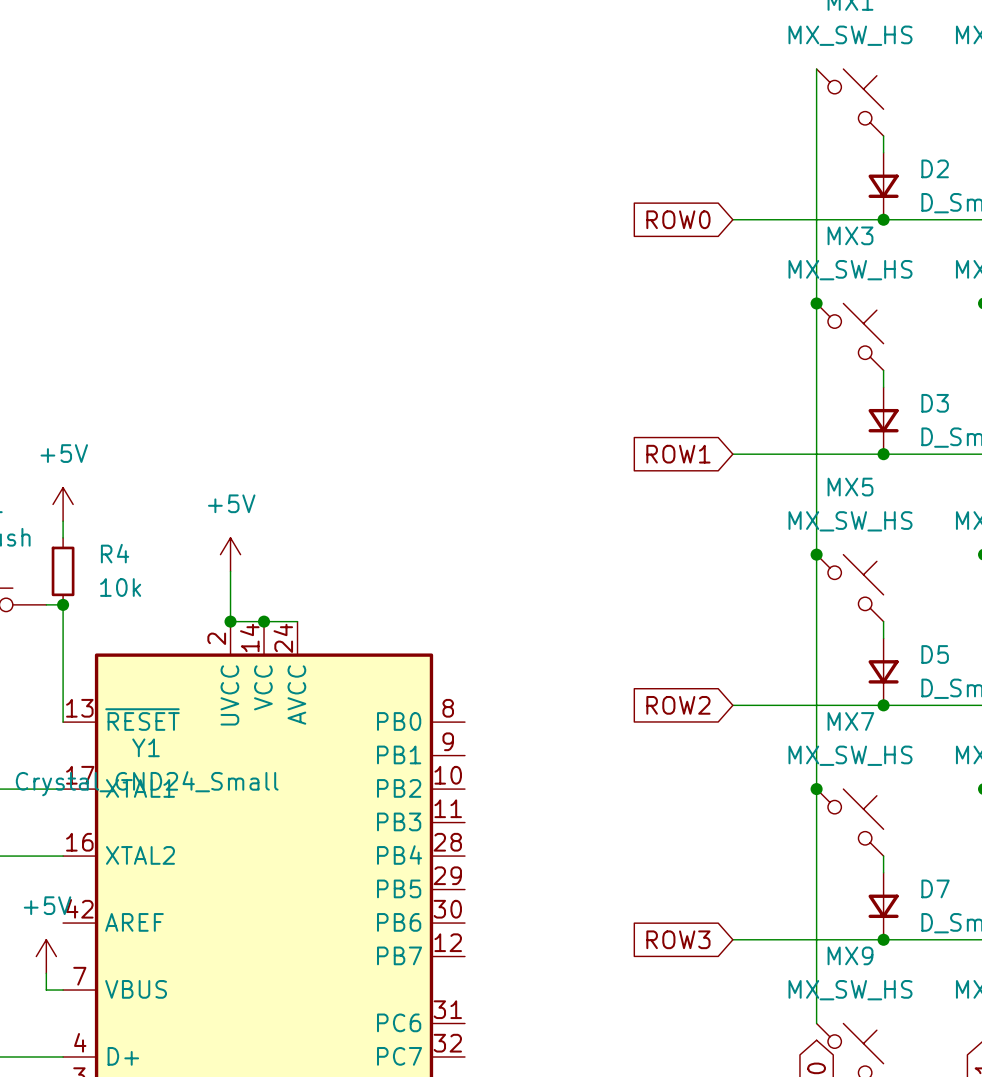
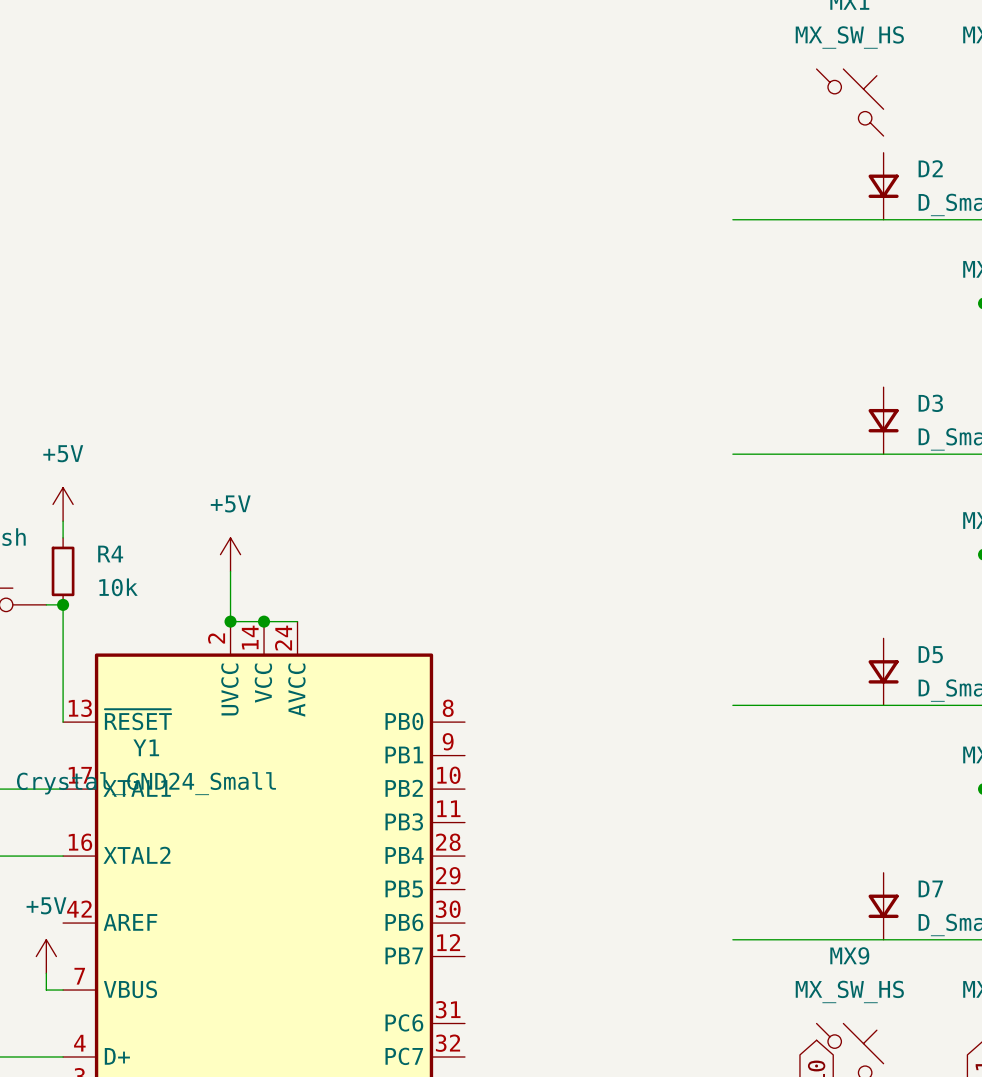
wire: (816, 69) (816, 1023) -> none
wire: (883, 136) (883, 152) -> none
global label: ROW0 (678, 219) -> none
junction: (883, 219) -> none
junction: (816, 303) -> none
MX3: MX_SW_HS (850, 336) -> none
wire: (883, 370) (883, 387) -> none
global label: ROW1 (678, 454) -> none
junction: (883, 454) -> none
junction: (816, 554) -> none
MX5: MX_SW_HS (850, 588) -> none
wire: (883, 621) (883, 638) -> none
global label: ROW2 (678, 705) -> none
junction: (883, 705) -> none
junction: (816, 789) -> none
MX7: MX_SW_HS (850, 822) -> none
wire: (883, 856) (883, 872) -> none
global label: ROW3 (678, 939) -> none
junction: (883, 939) -> none

